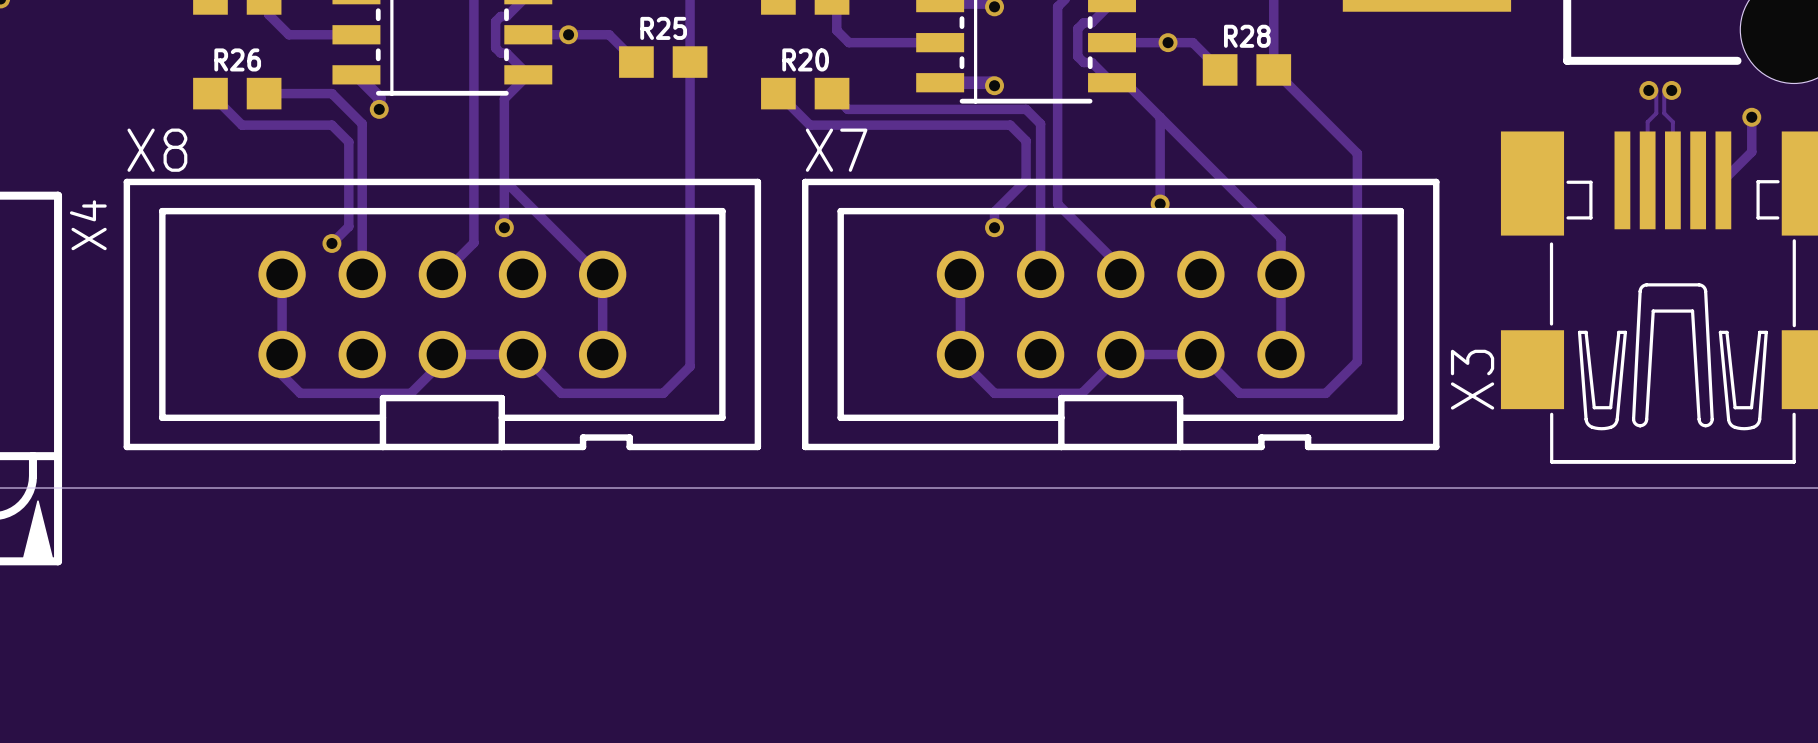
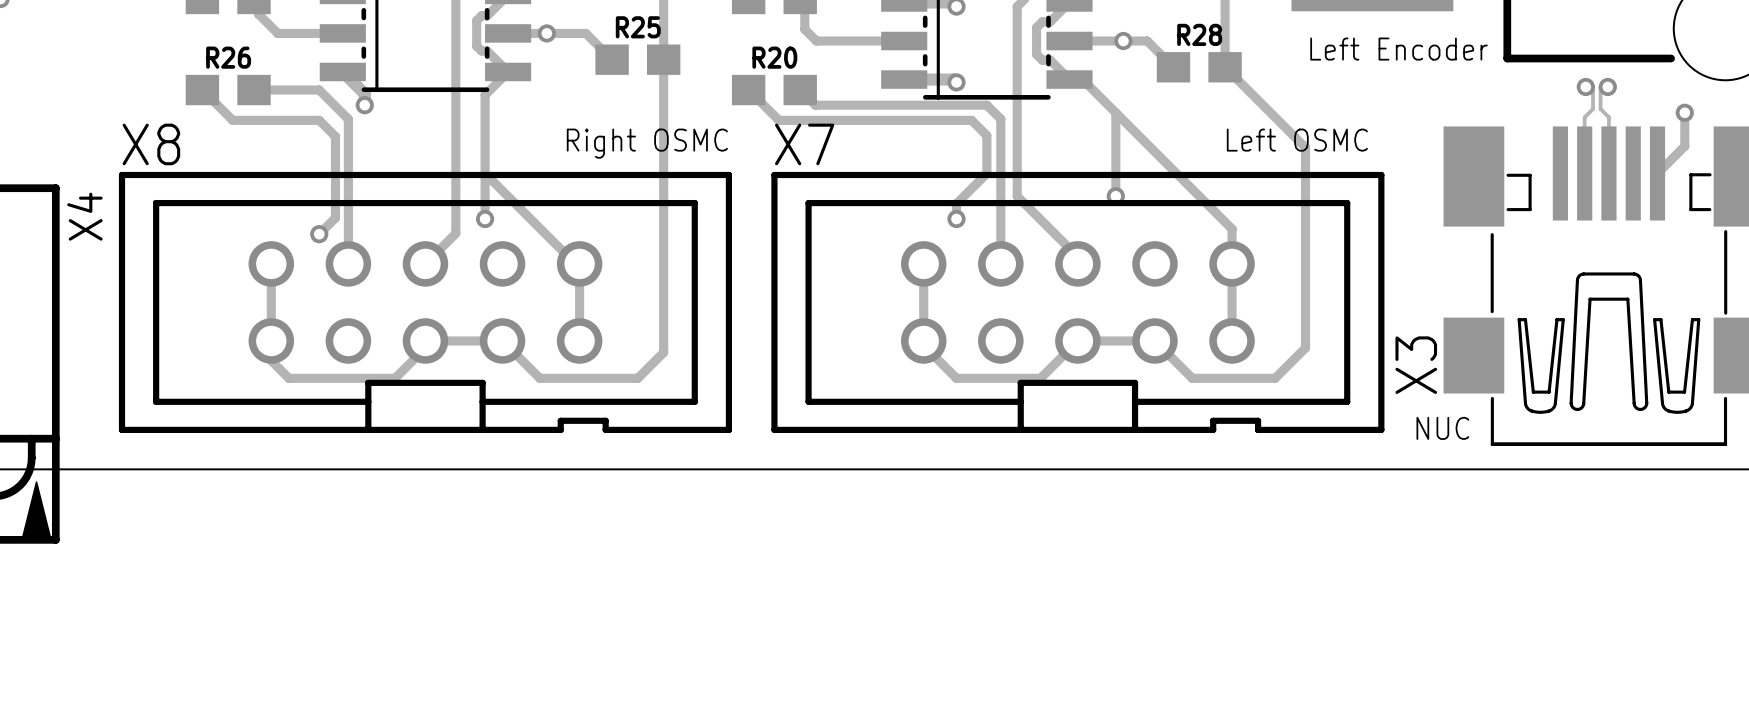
text: none -> Left Encoder (1399, 49)
text: none -> Left OSMC (1297, 140)
text: none -> Right OSMC (647, 143)
text: none -> NUC (1442, 428)

